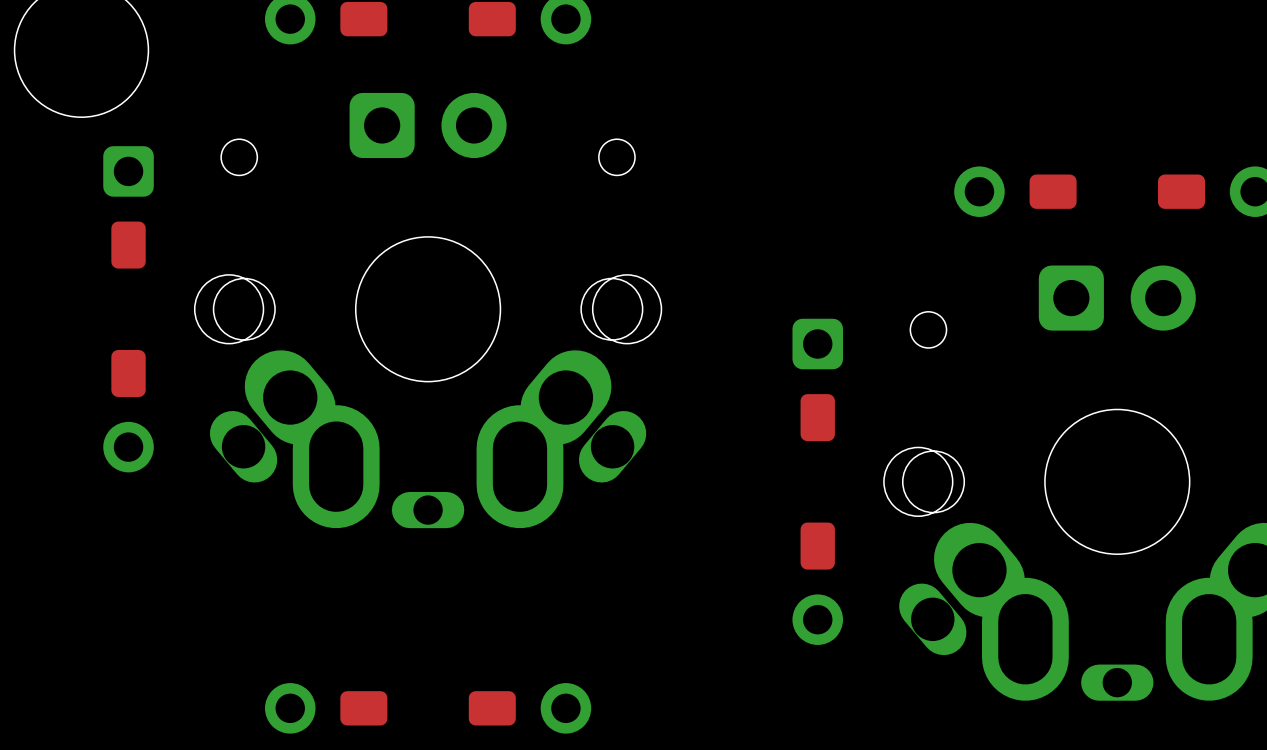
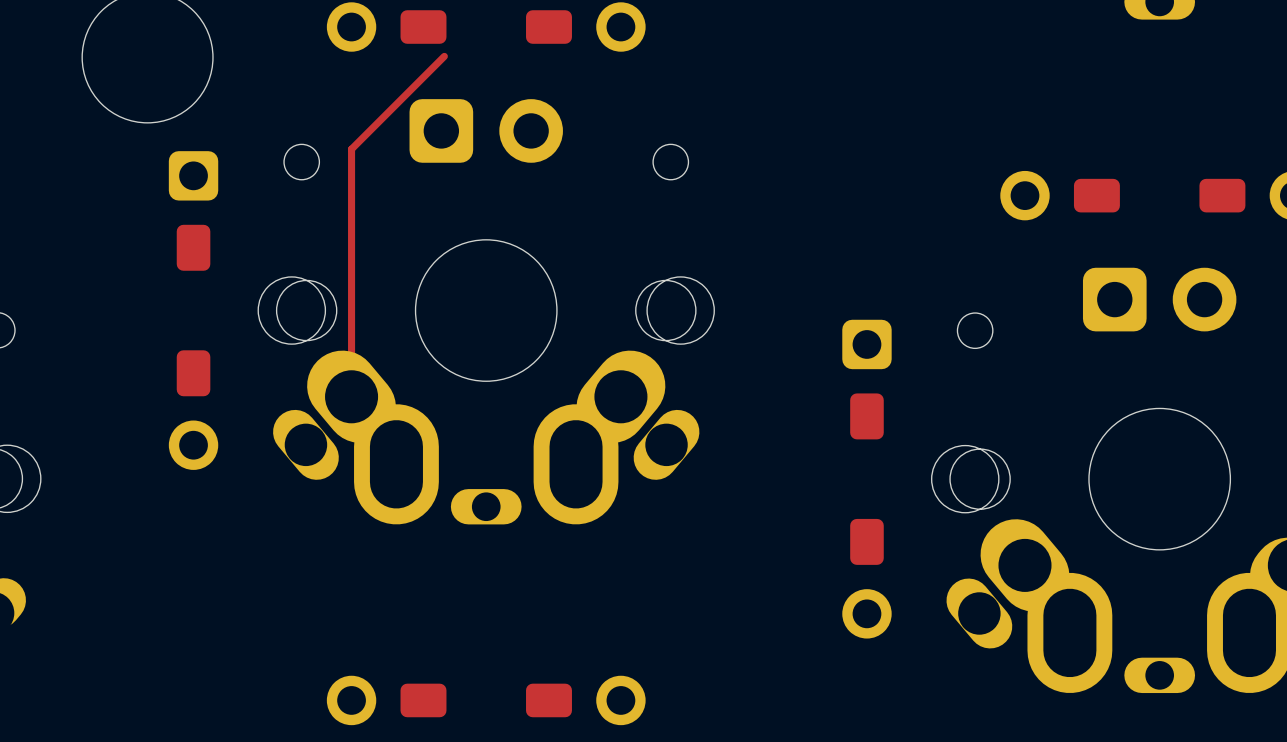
track: none -> (444, 56) (351, 149) (351, 396)

